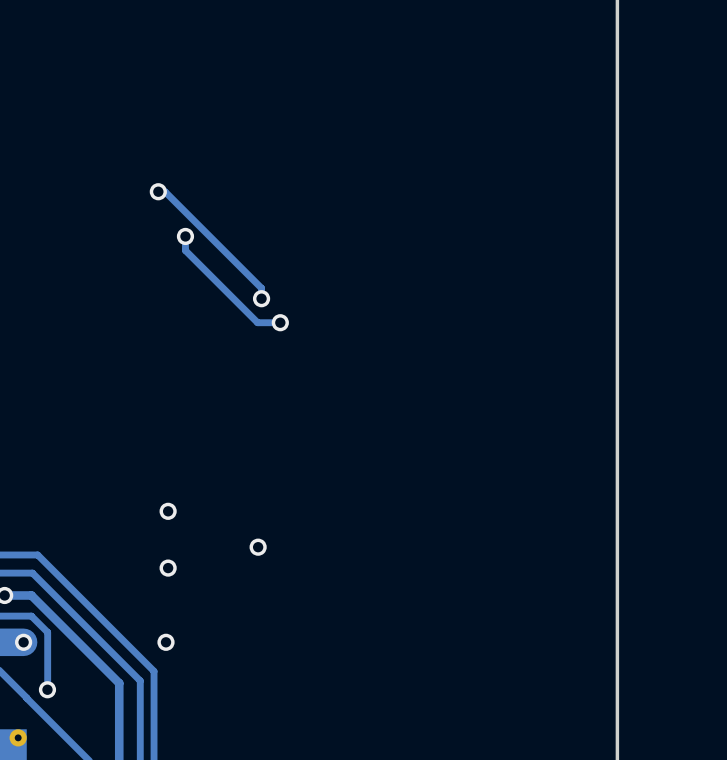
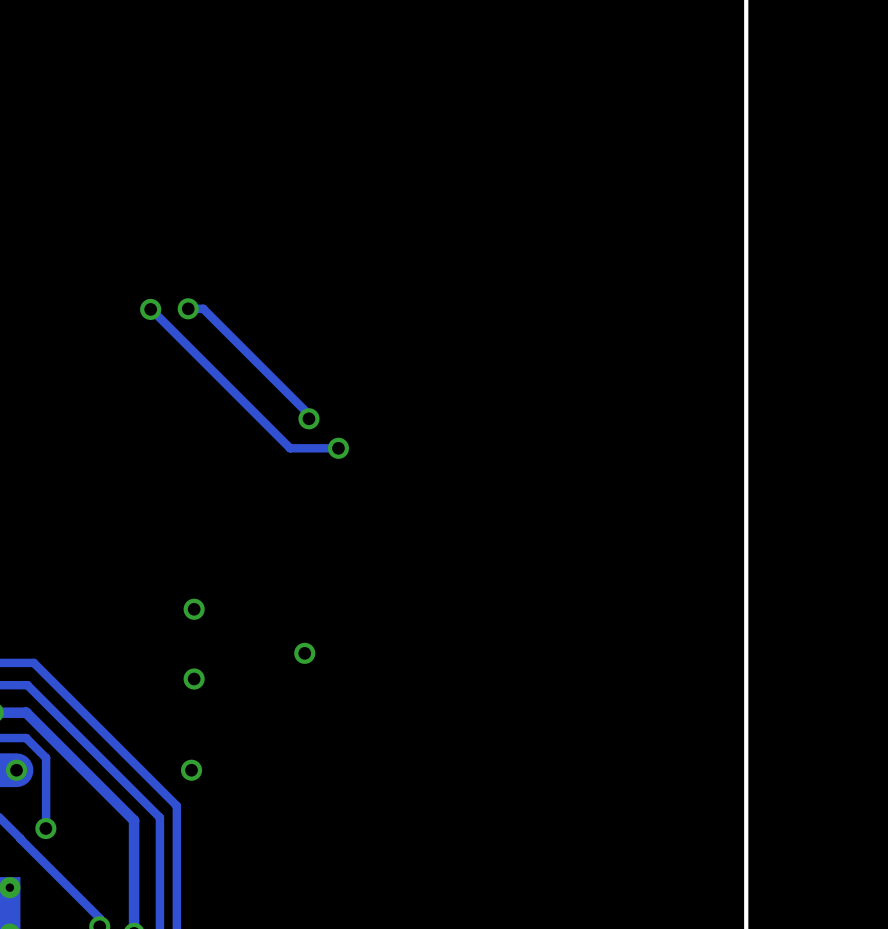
track: (158, 191) (165, 191) (261, 288) (261, 298) -> none
via: (158, 191) -> none
track: (185, 236) (185, 250) (257, 322) (280, 322) -> none
via: (185, 236) -> none
track: none -> (188, 308) (203, 308) (308, 414) (308, 418)
via: none -> (188, 308)
via: none -> (150, 309)
track: none -> (151, 309) (290, 448) (338, 448)
via: (261, 298) -> none
via: (280, 322) -> none
via: none -> (308, 418)
via: none -> (338, 448)

